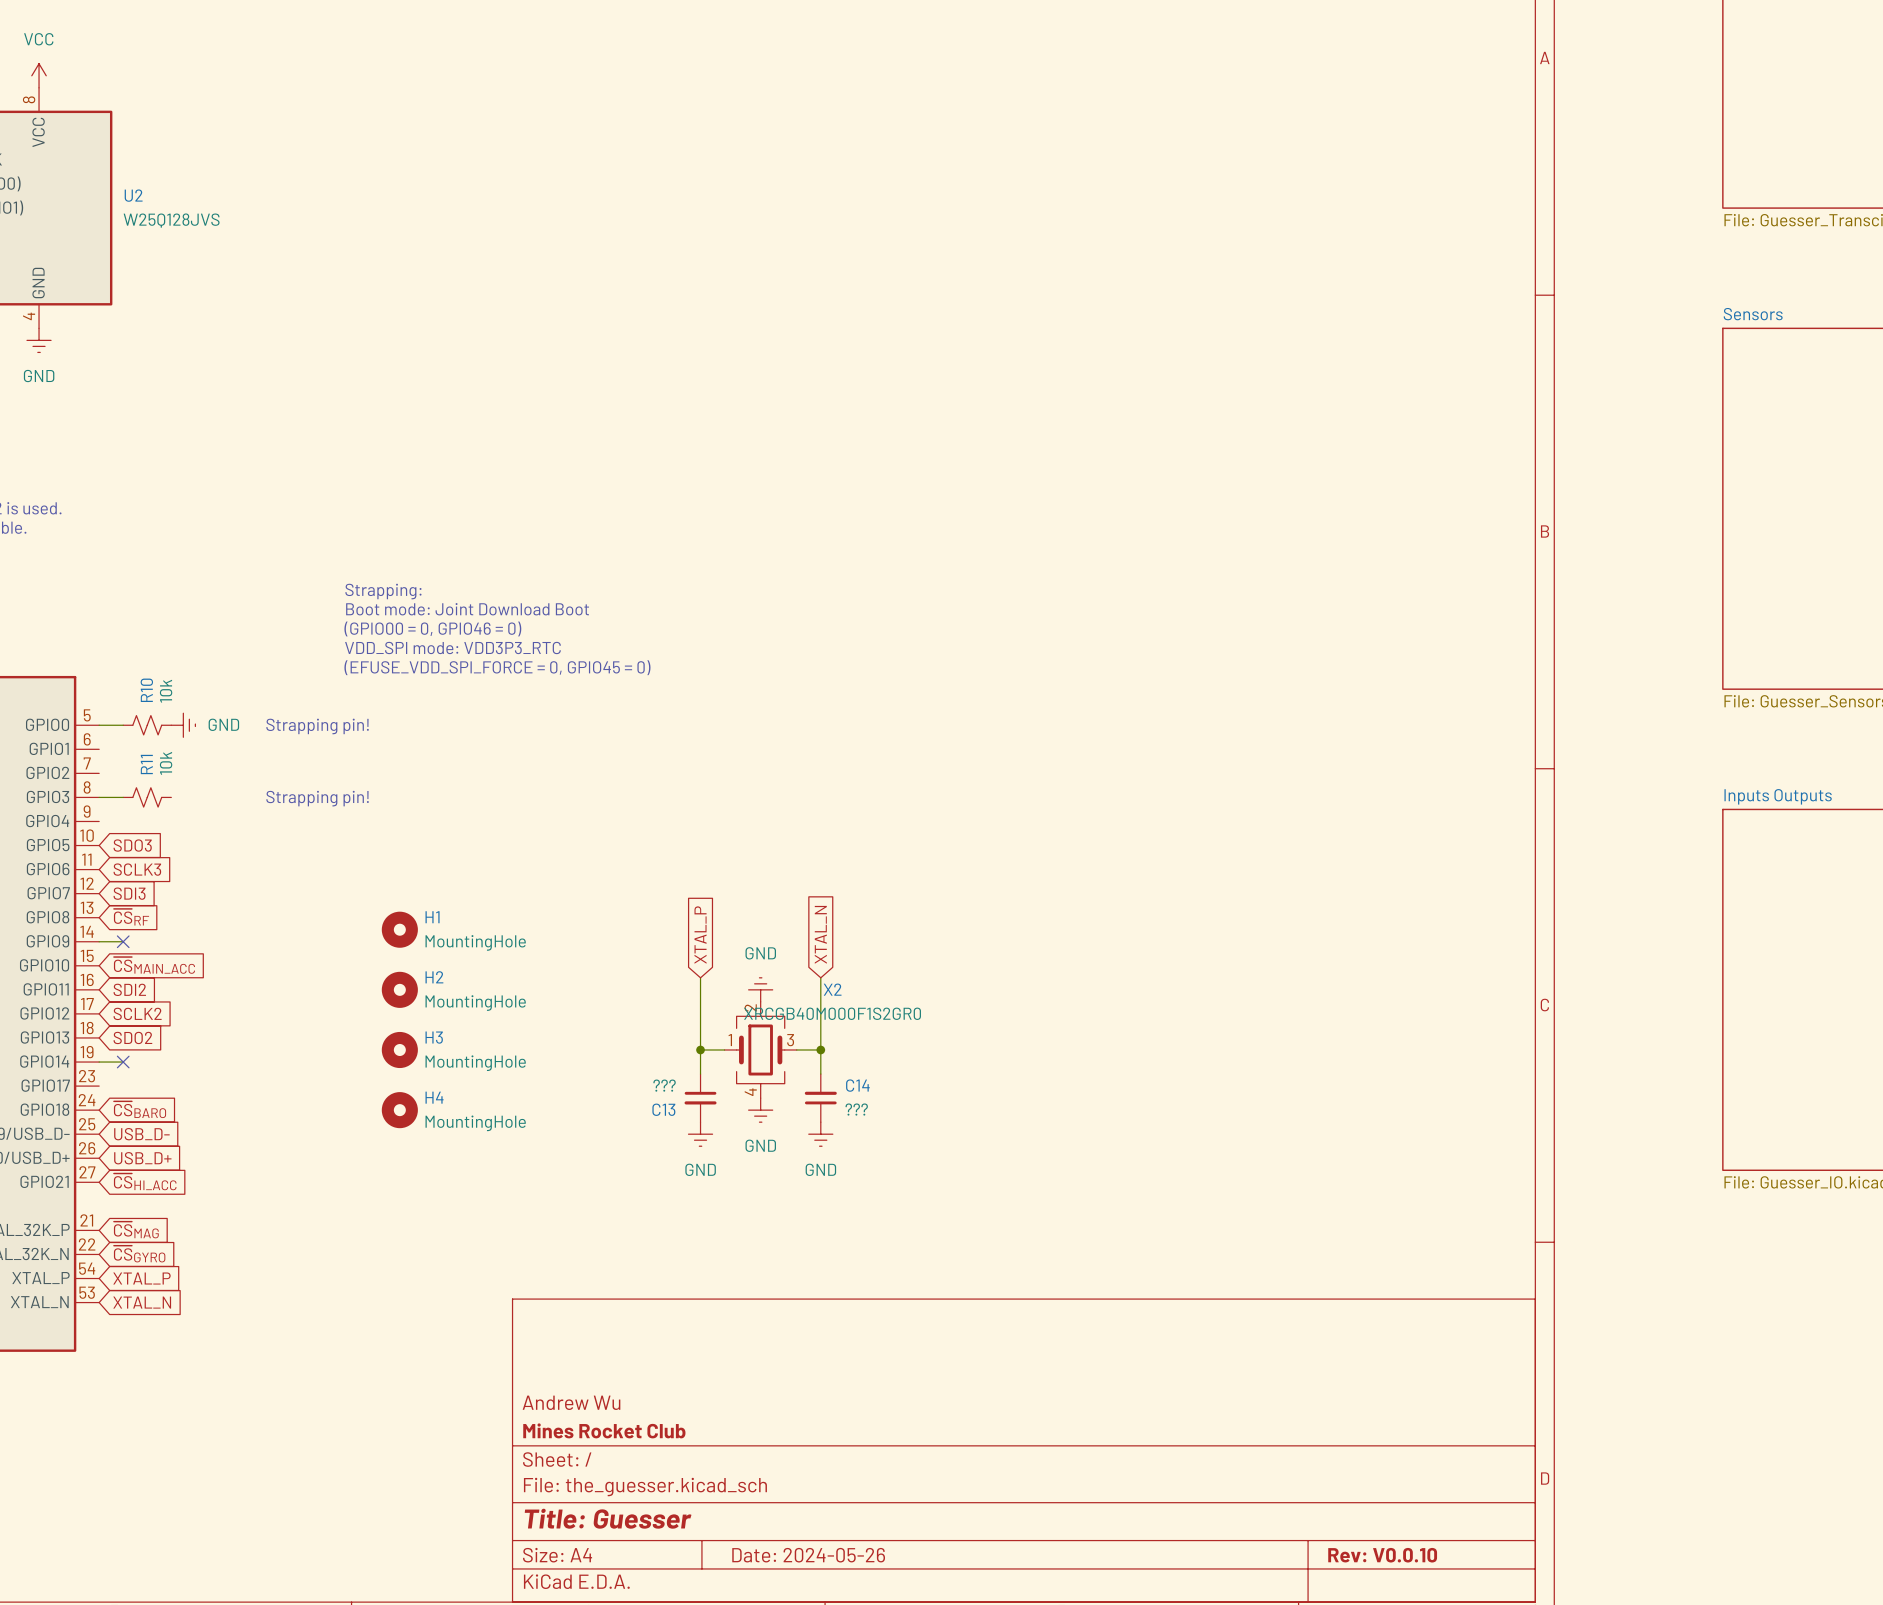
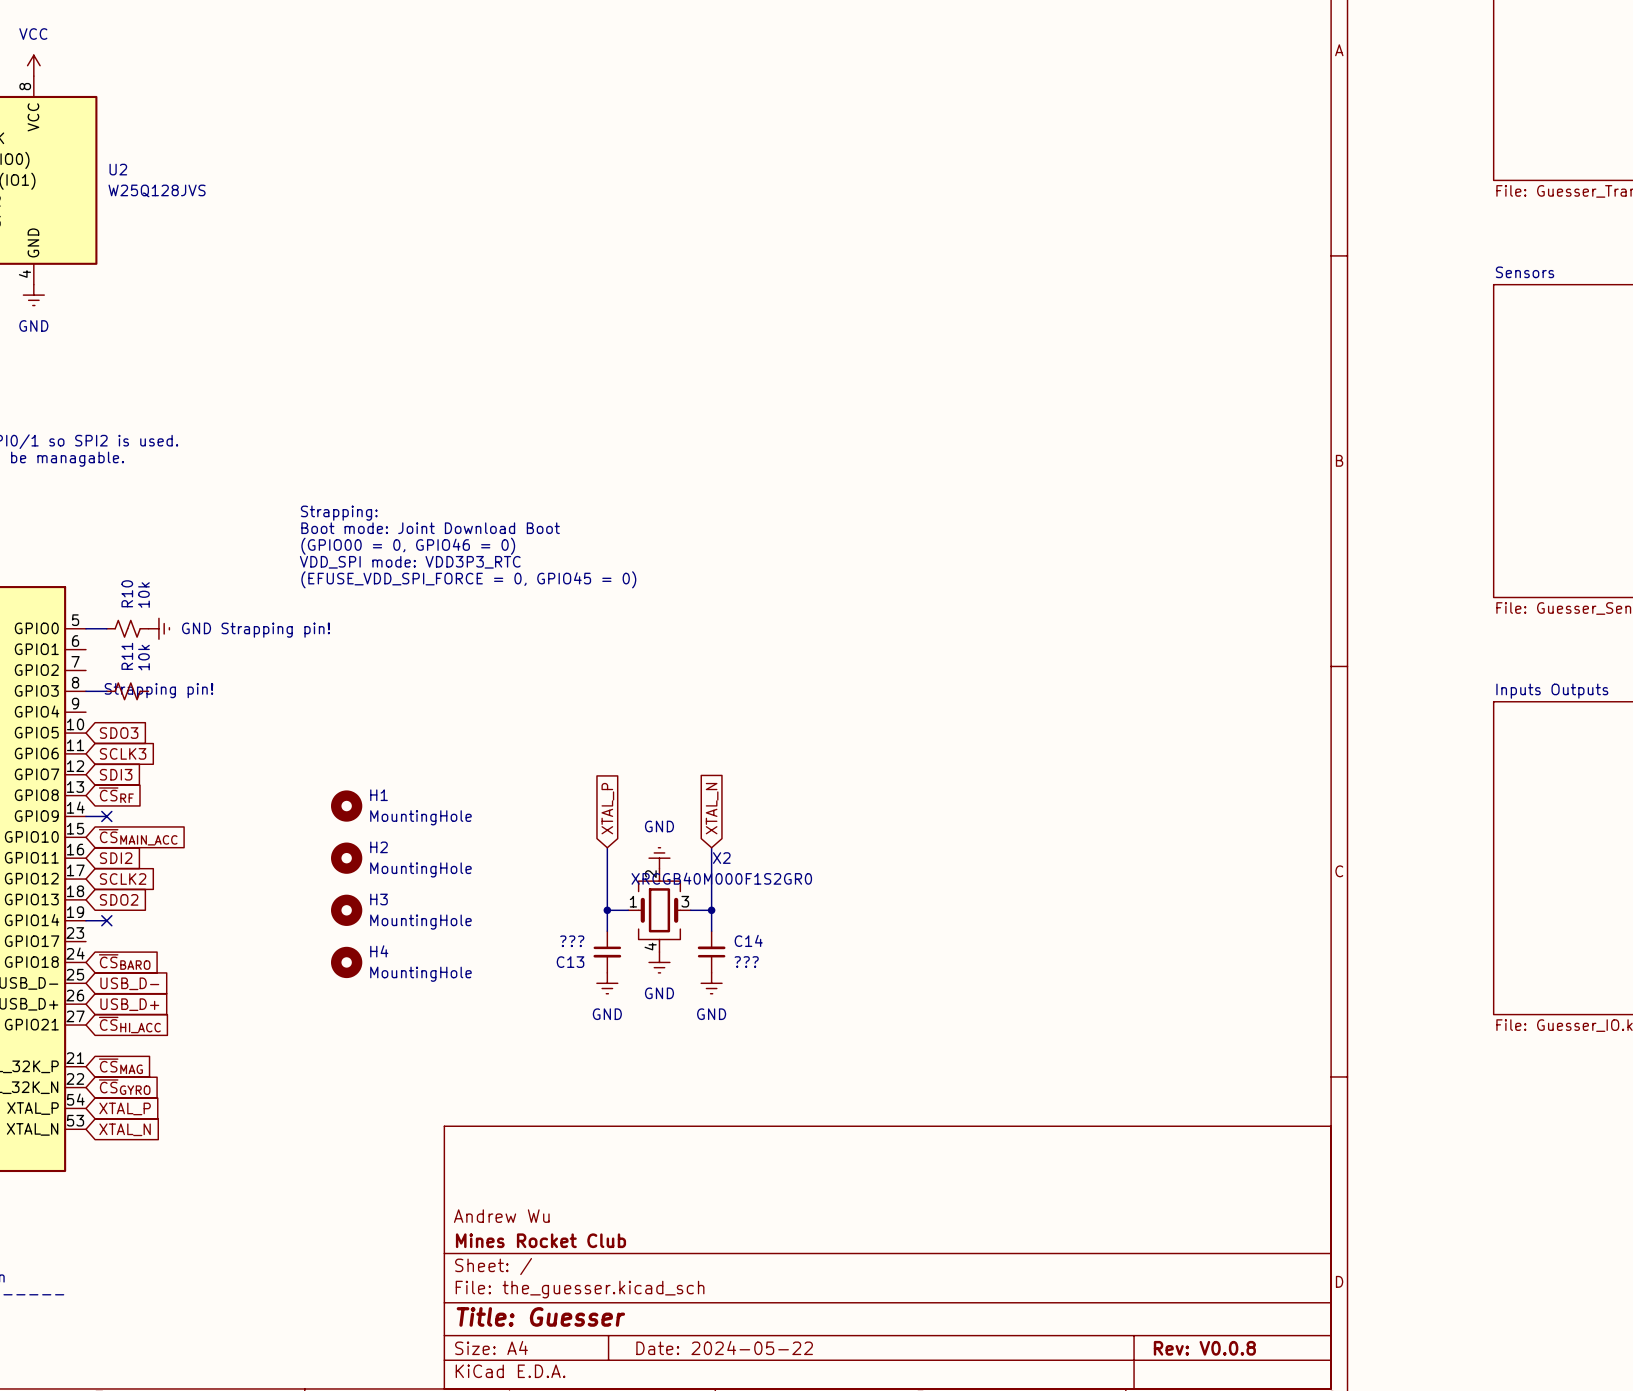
text position: Strapping pin! (317, 798) -> Strapping pin! (158, 690)
title block: Date: 2024-05-26 (808, 1555) -> Date: 2024-05-22 (724, 1348)
title block: Rev: V0.0.10 (1382, 1555) -> Rev: V0.0.8 (1204, 1348)

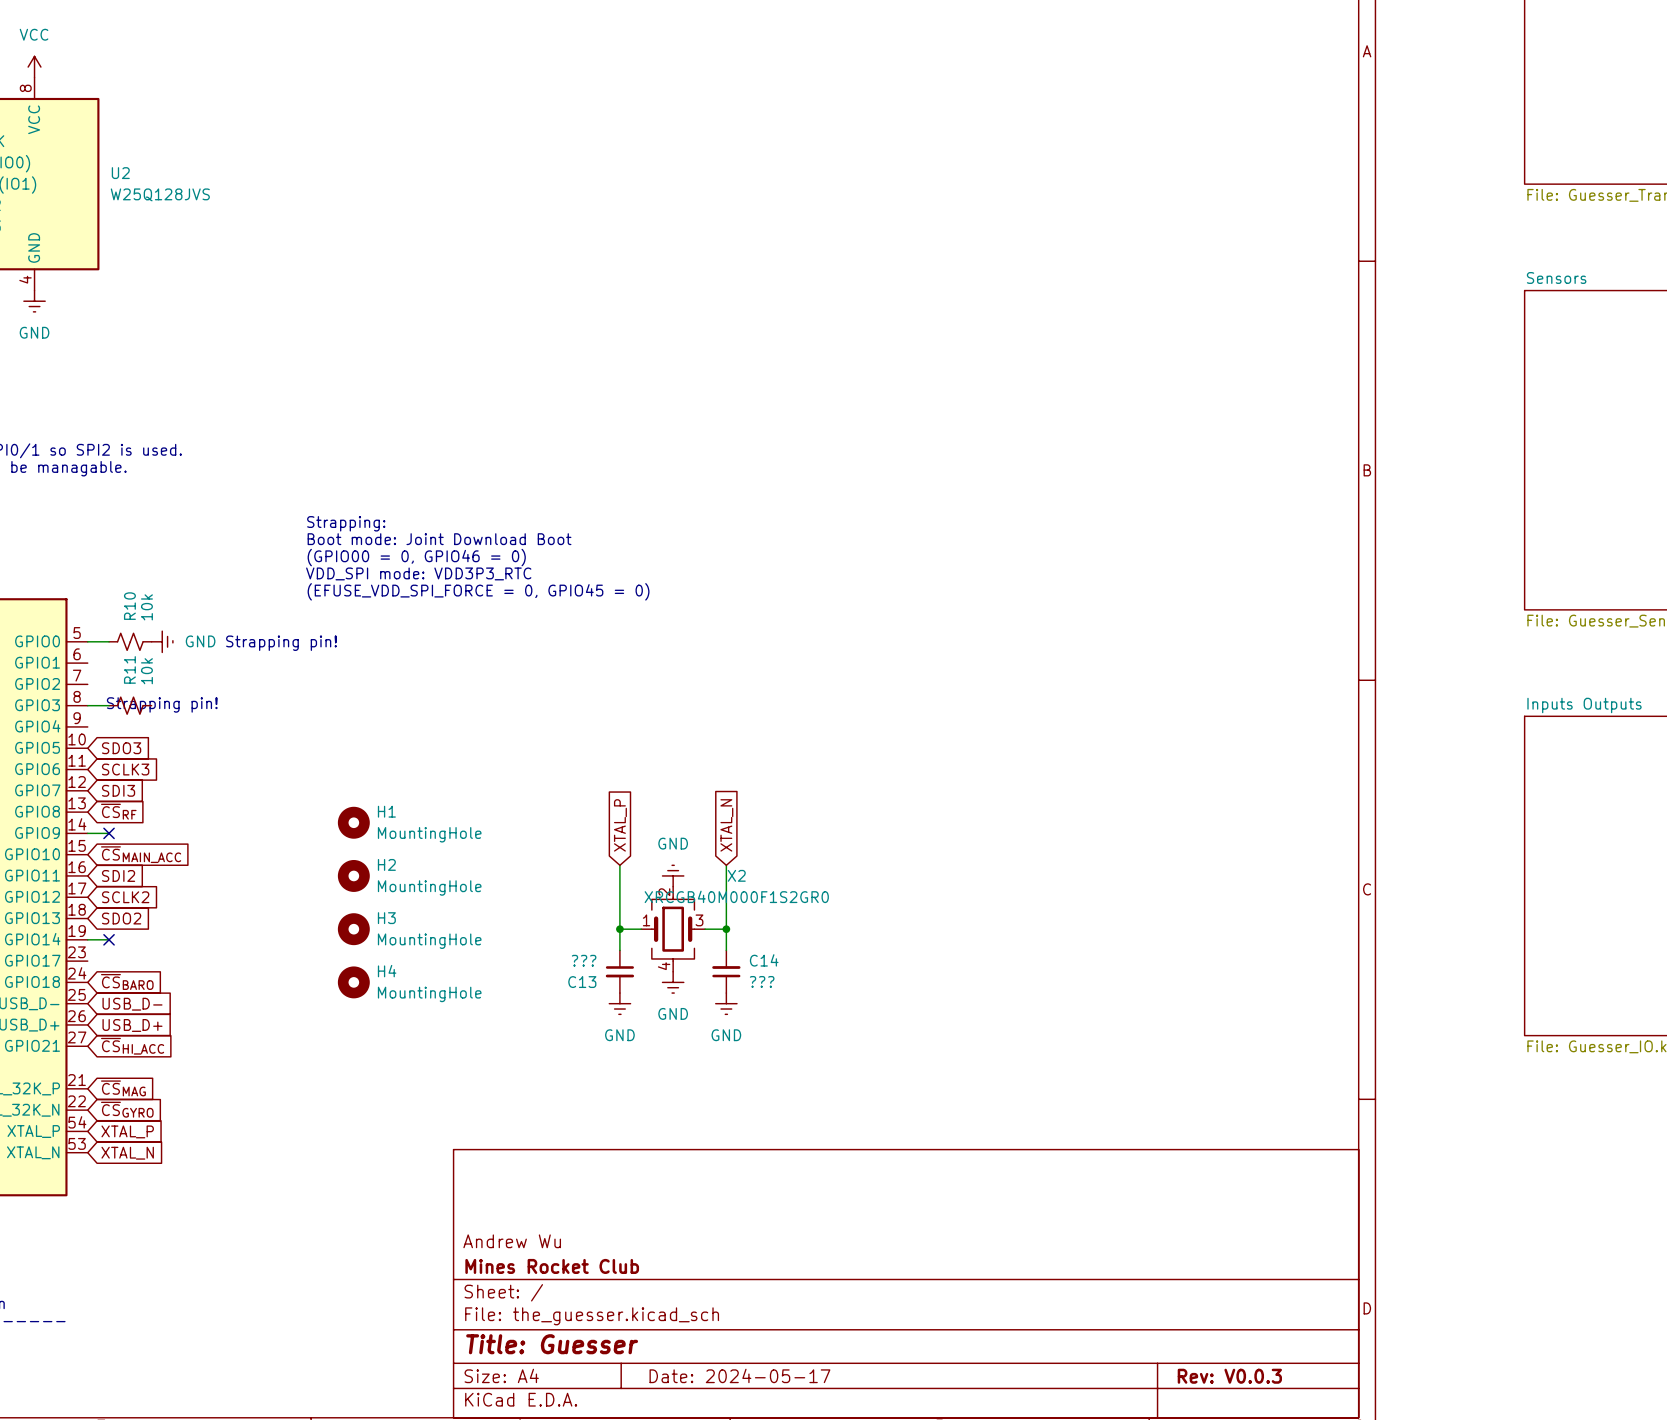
title block: Date: 2024-05-22 (724, 1348) -> Date: 2024-05-17 (739, 1375)
title block: Rev: V0.0.8 (1204, 1348) -> Rev: V0.0.3 (1229, 1376)

